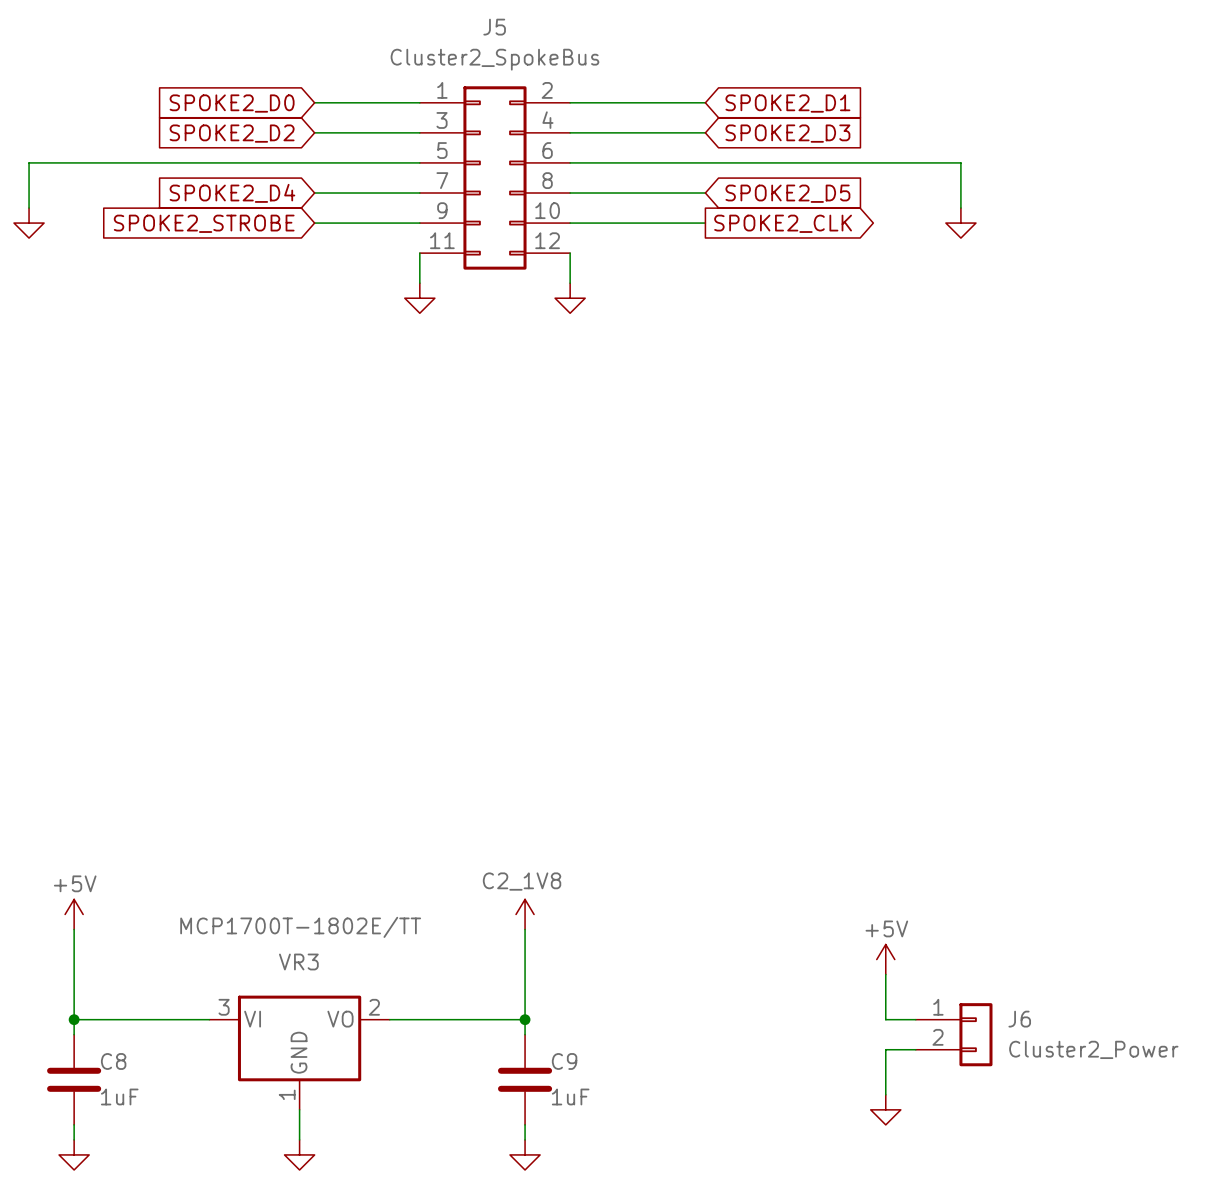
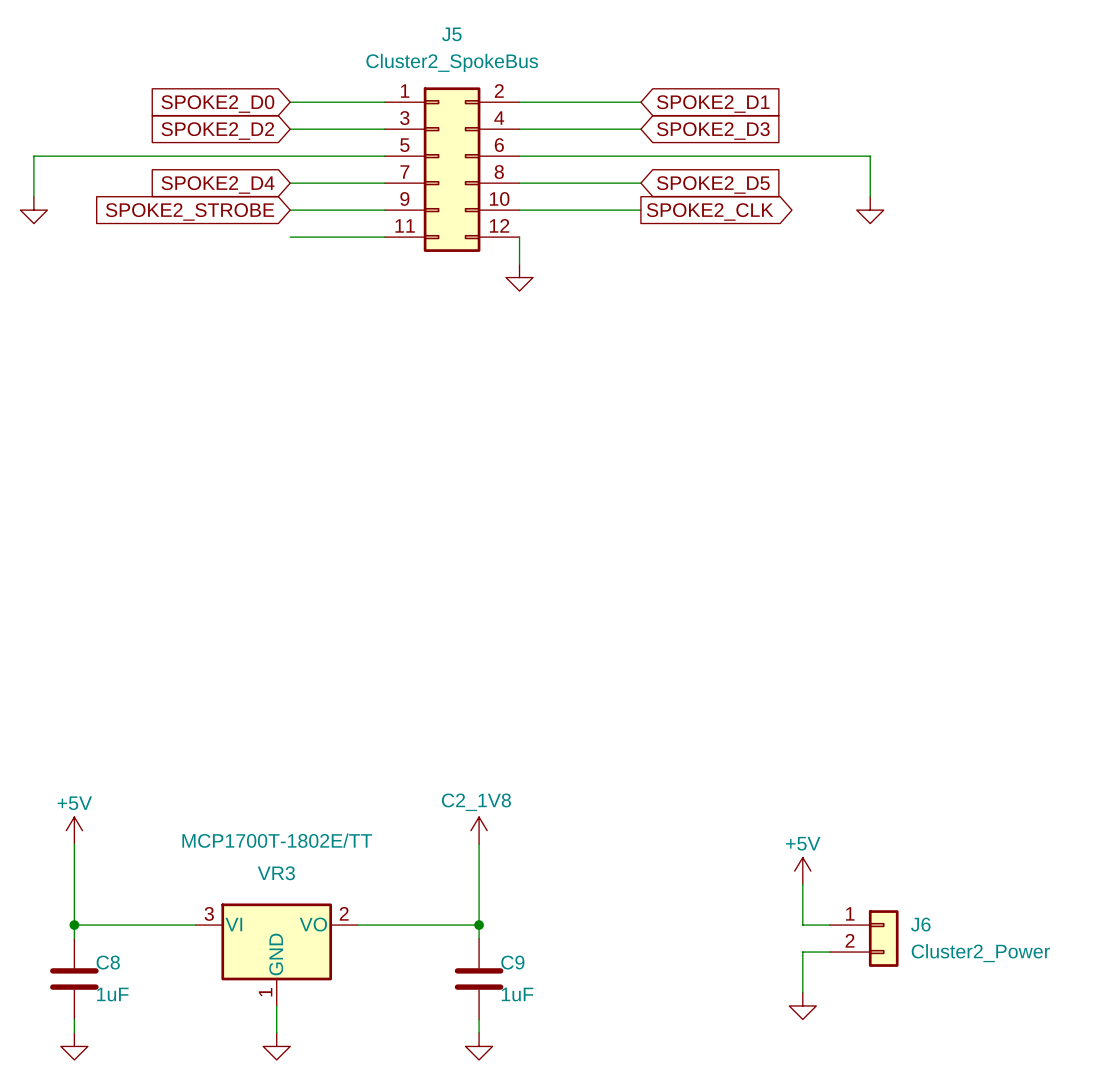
wire: (419, 253) (419, 283) -> (384, 237) (290, 237)
power symbol: (419, 298) -> none

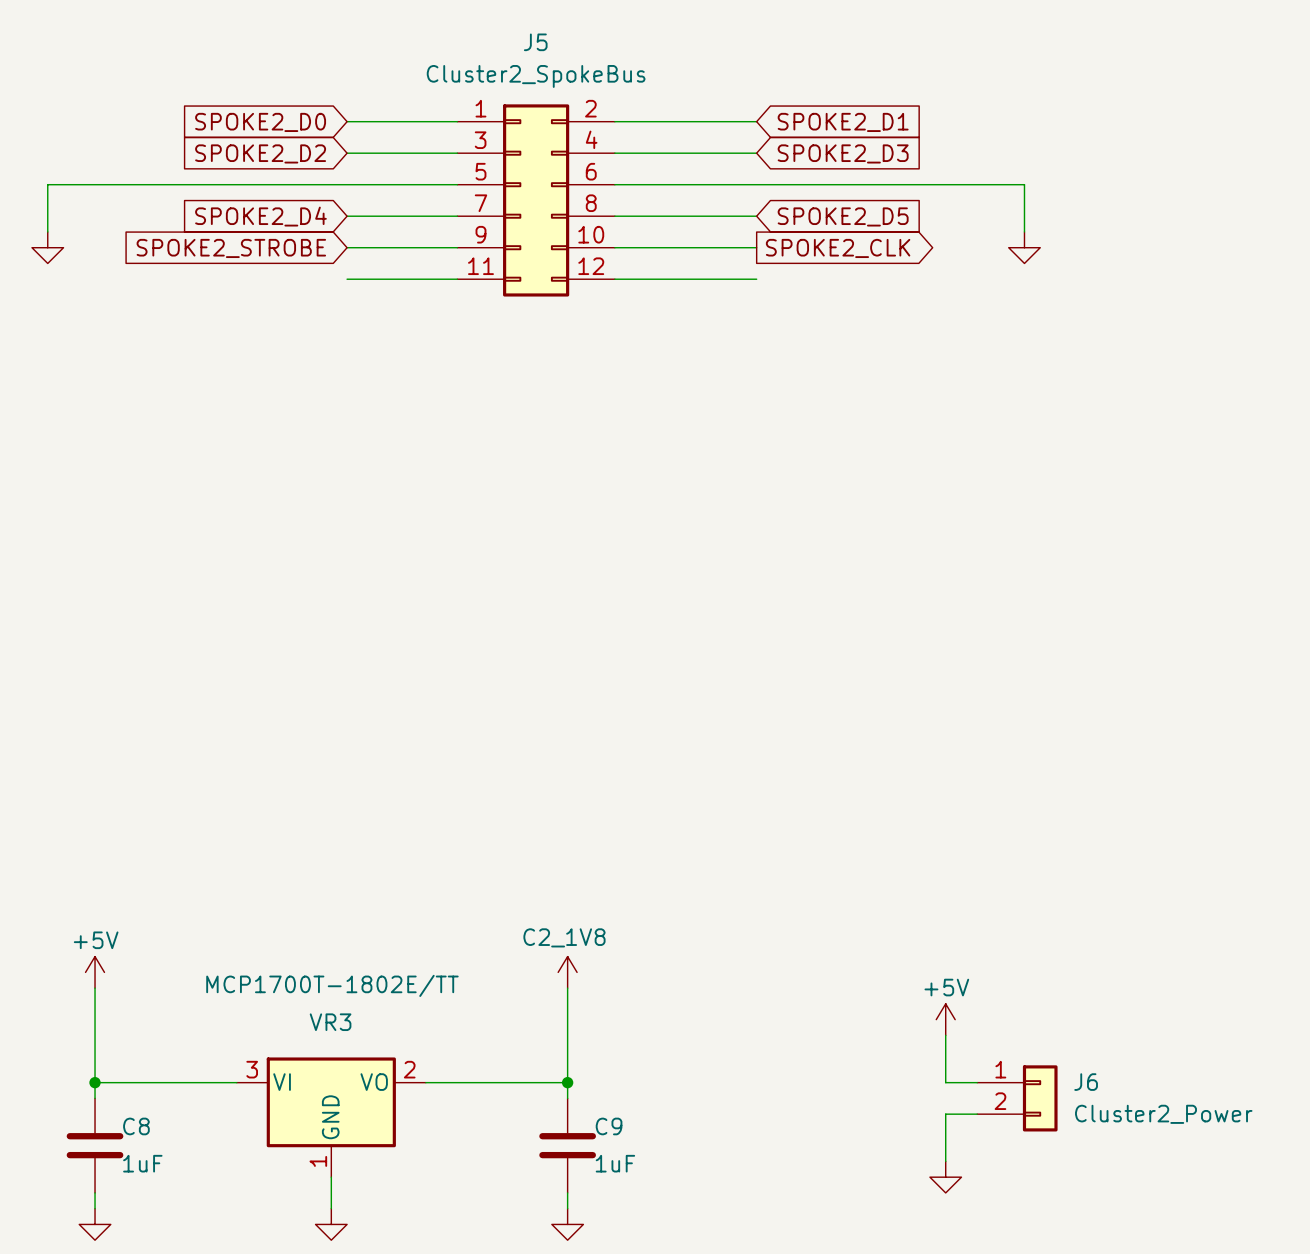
wire: (519, 237) (519, 264) -> (614, 279) (756, 279)
power symbol: (519, 277) -> none

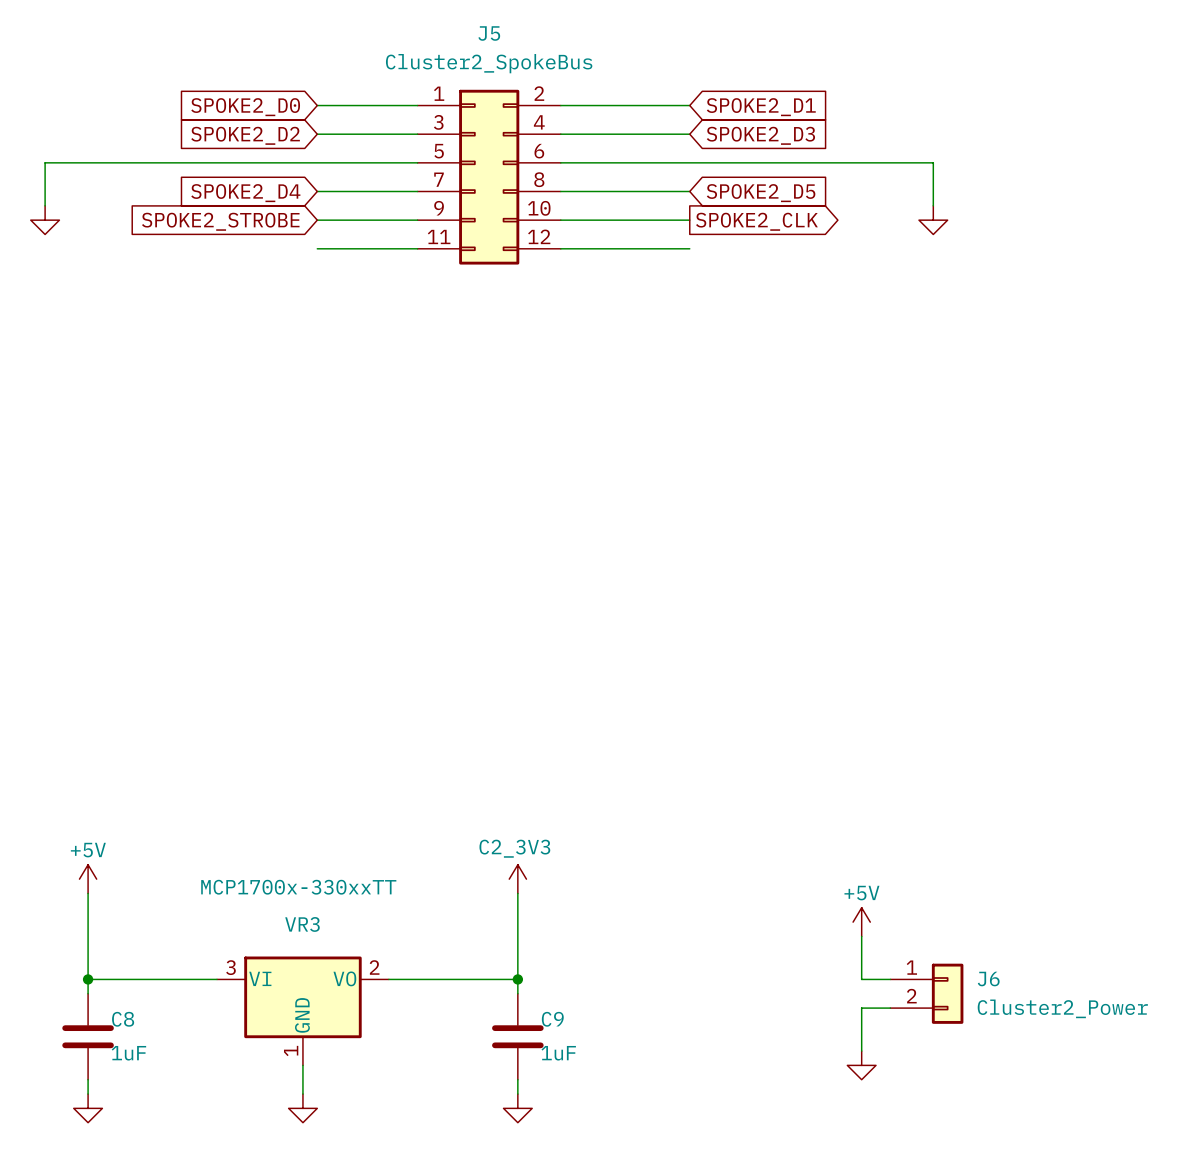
power symbol: C2_1V8 (567, 972) -> C2_3V3 (517, 879)
VR3 value: MCP1700T-1802E/TT (332, 985) -> MCP1700x-330xxTT (298, 887)

